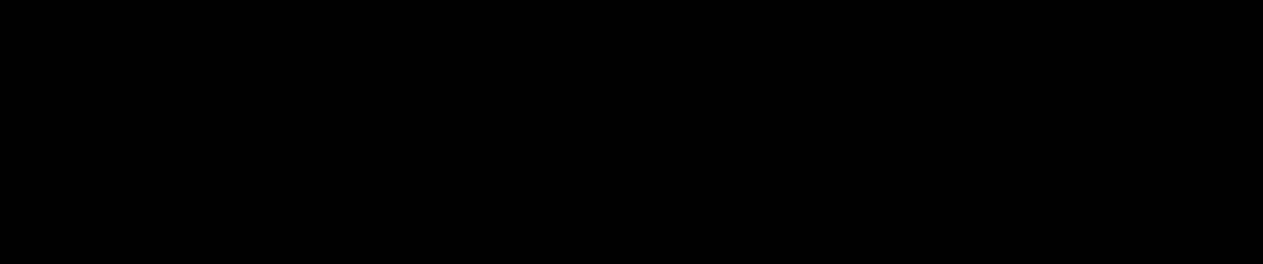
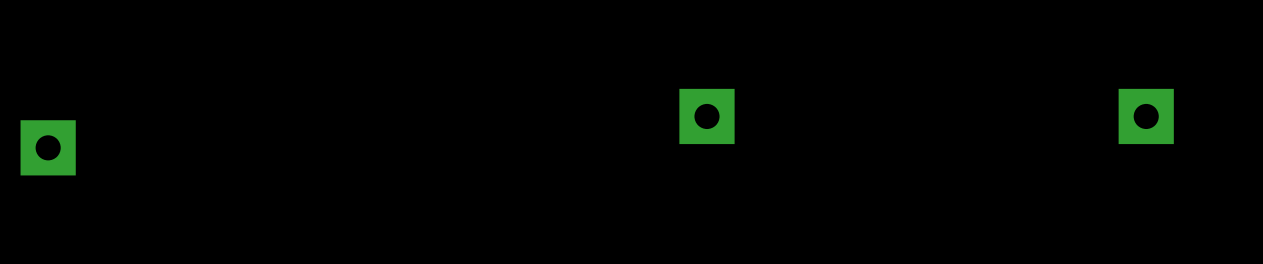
part: none -> (707, 116)
part: none -> (1146, 116)
part: none -> (48, 147)

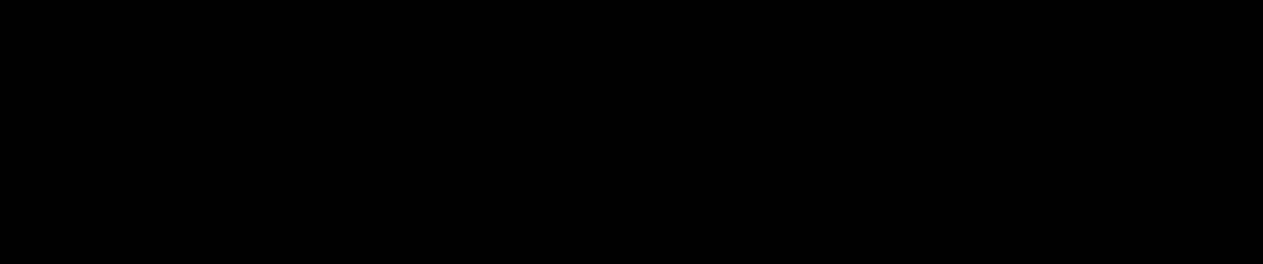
part: (707, 116) -> none
part: (1146, 116) -> none
part: (48, 147) -> none

